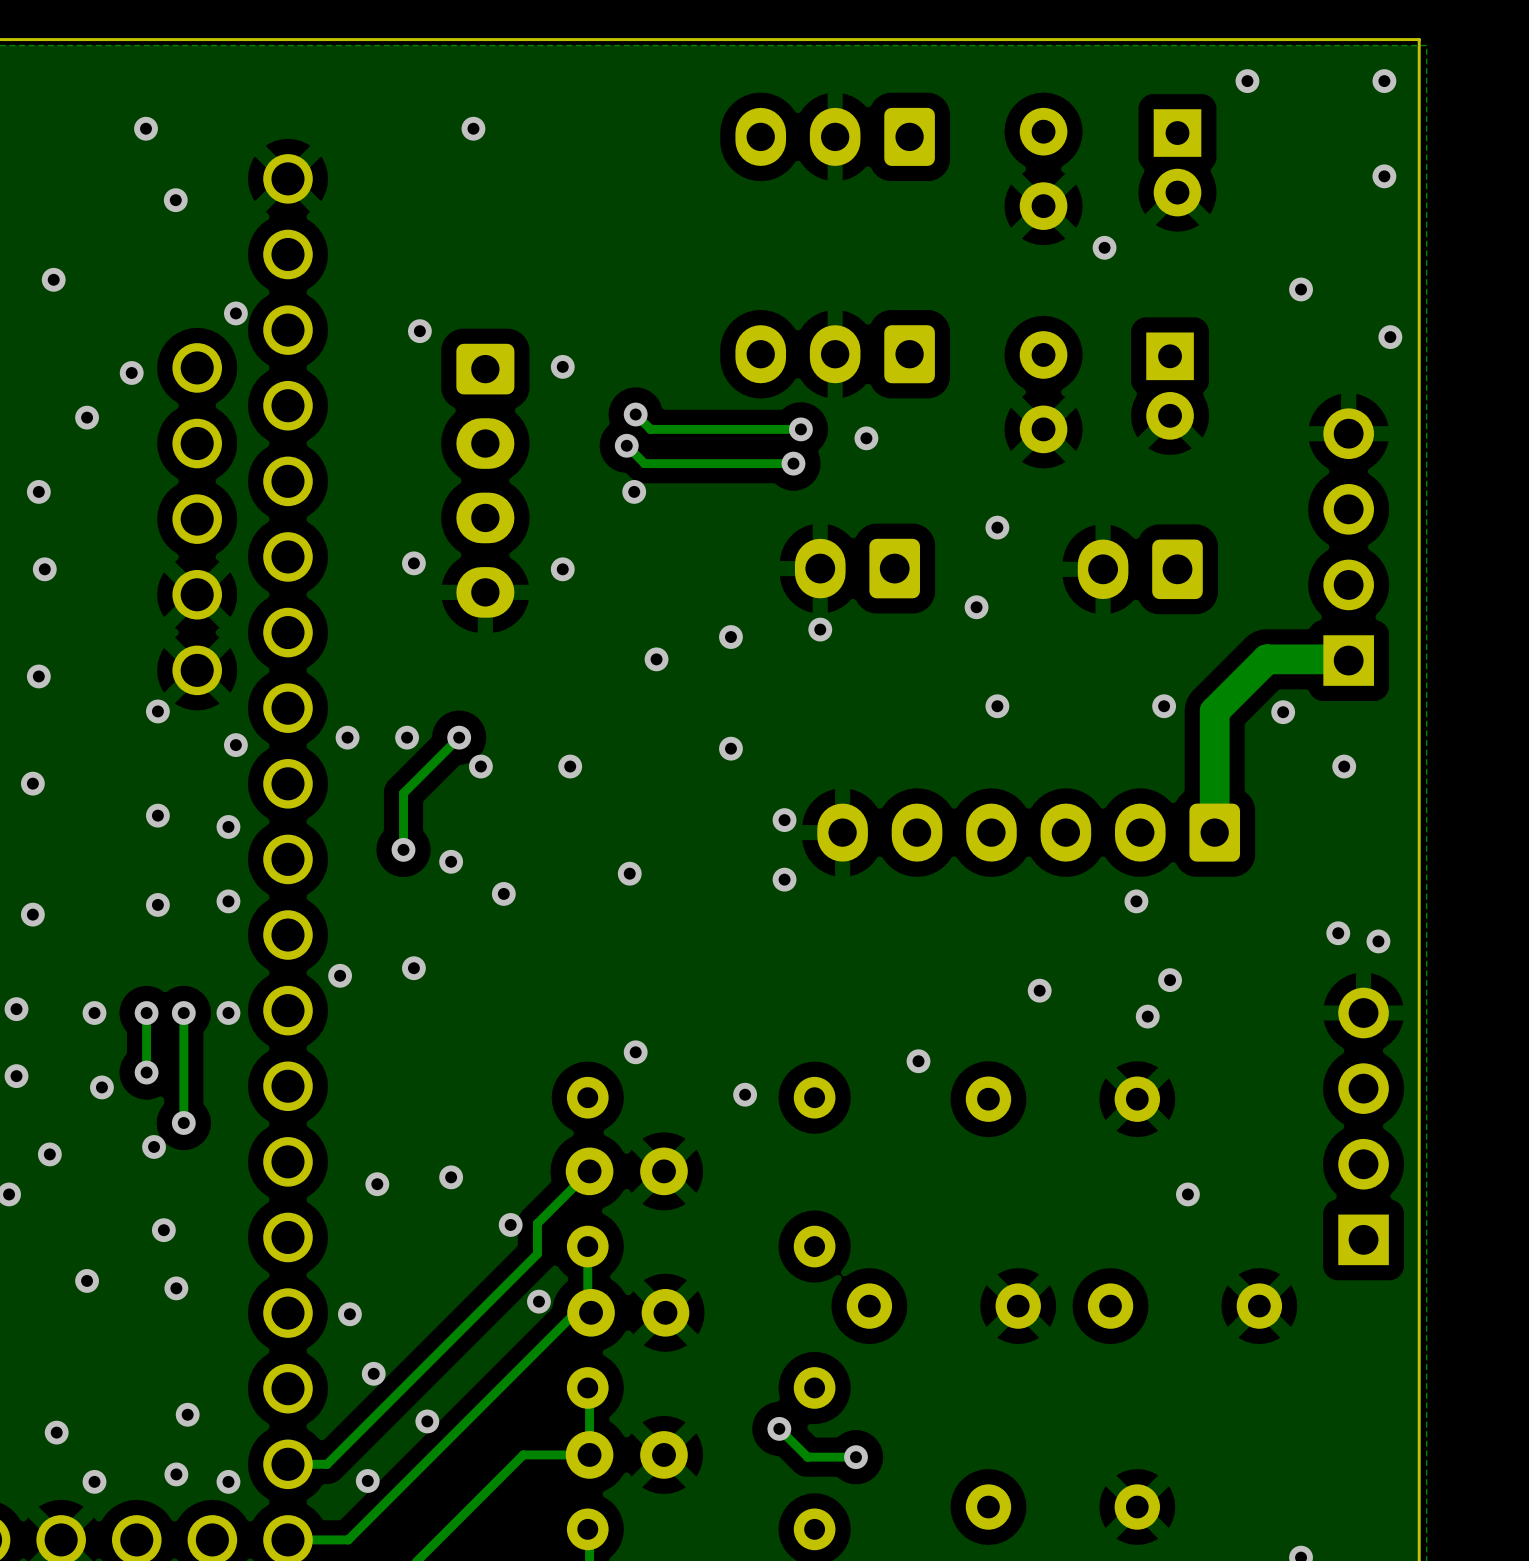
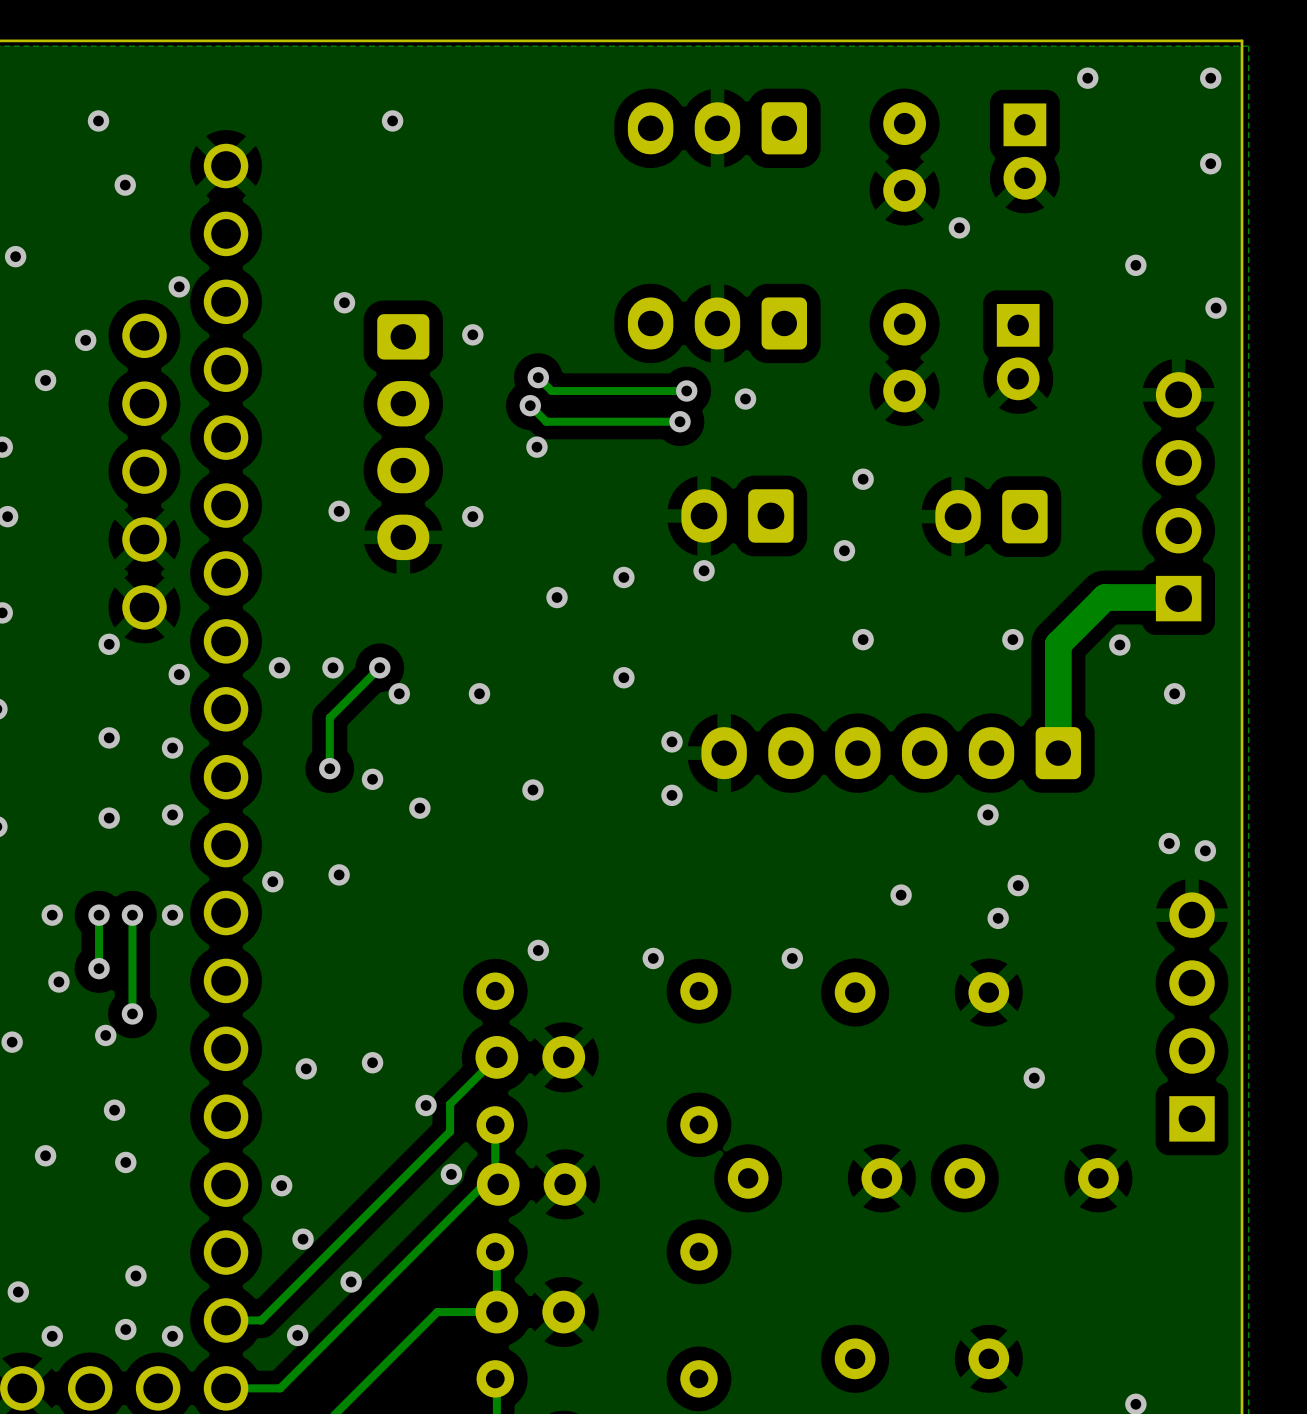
via position: (745, 1094) -> (653, 958)
track: (779, 1428) (807, 1457) (855, 1457) -> none
via: (779, 1428) -> none
via: (855, 1457) -> none

